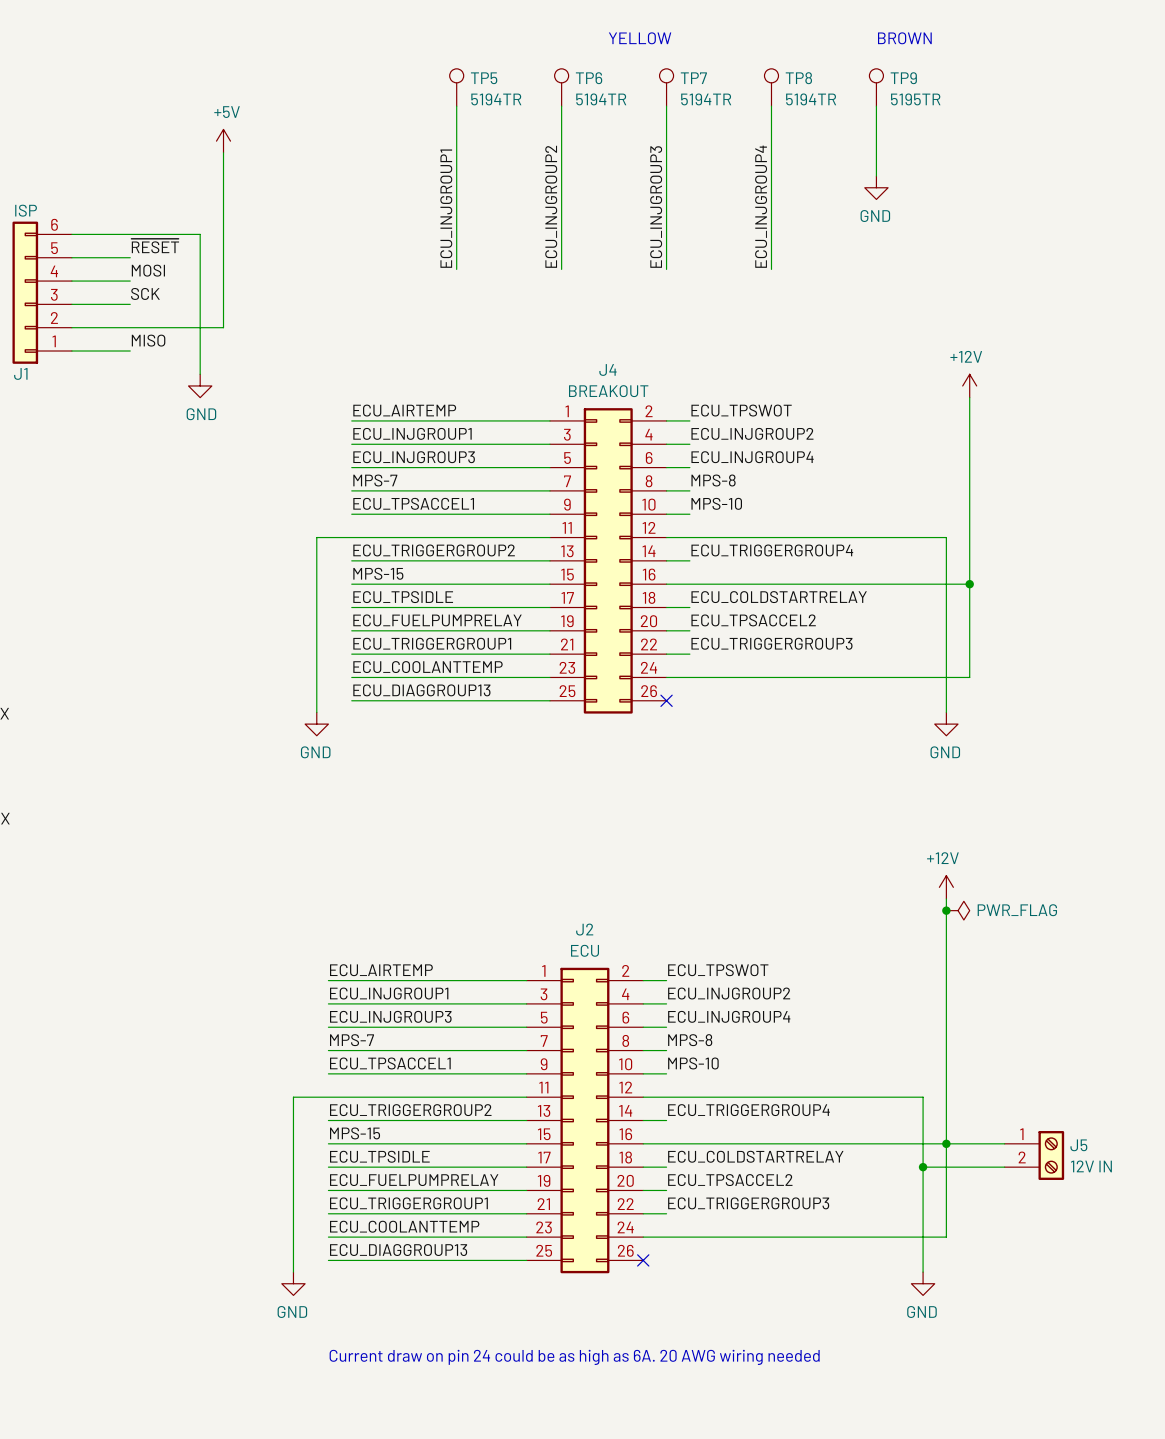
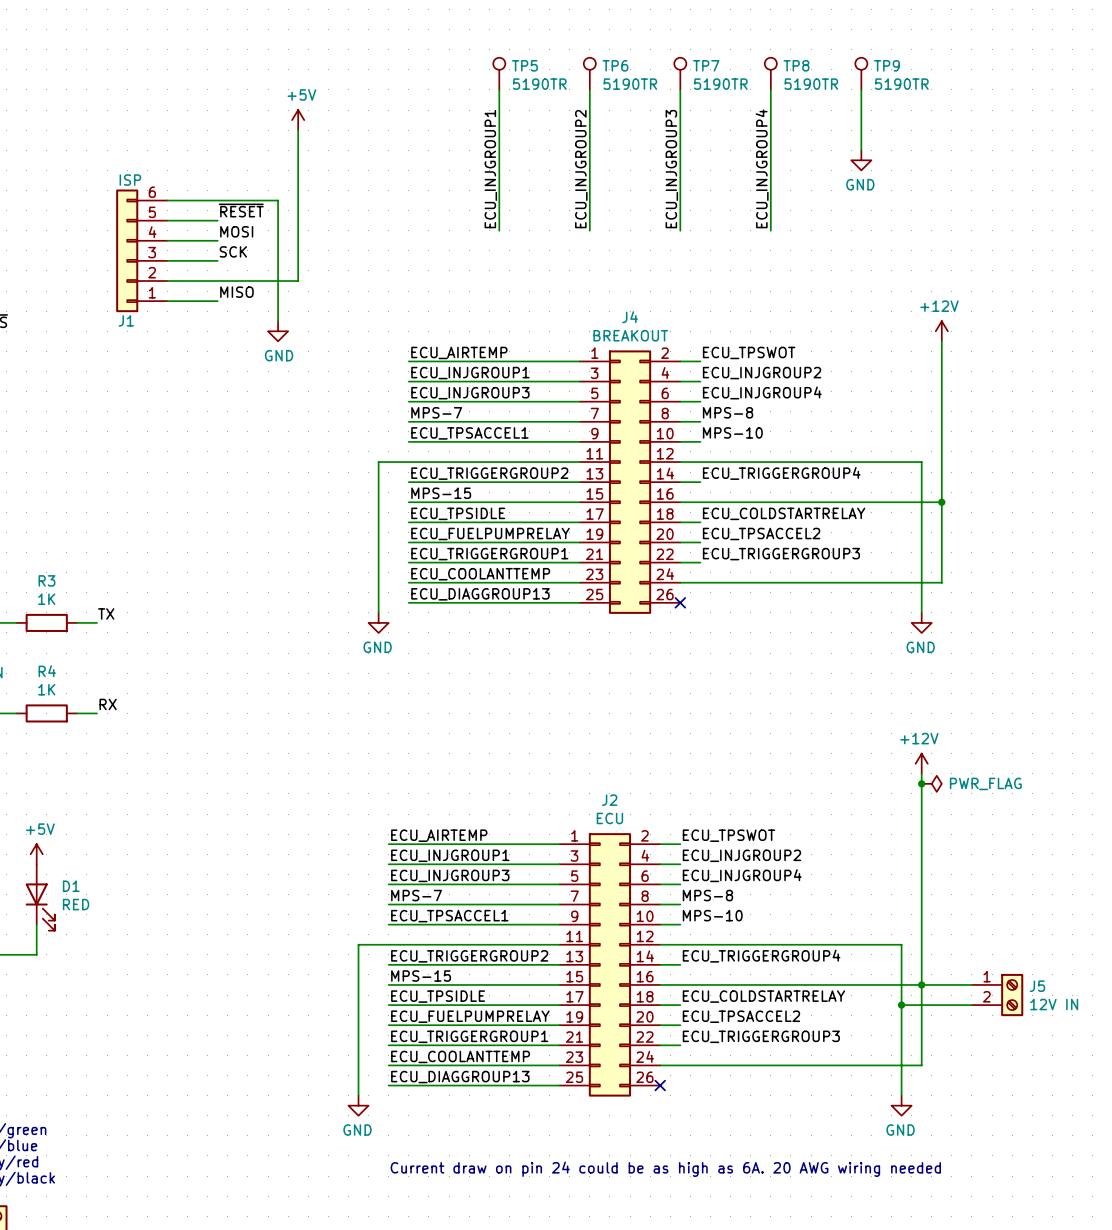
text: YELLOW (640, 38) -> none
text: BROWN (904, 38) -> none
TP5 value: 5194TR (496, 99) -> 5190TR (539, 84)
TP6 value: 5194TR (601, 99) -> 5190TR (630, 84)
TP7 value: 5194TR (706, 99) -> 5190TR (720, 84)
TP8 value: 5194TR (811, 99) -> 5190TR (811, 84)
TP9 value: 5195TR (915, 99) -> 5190TR (901, 84)

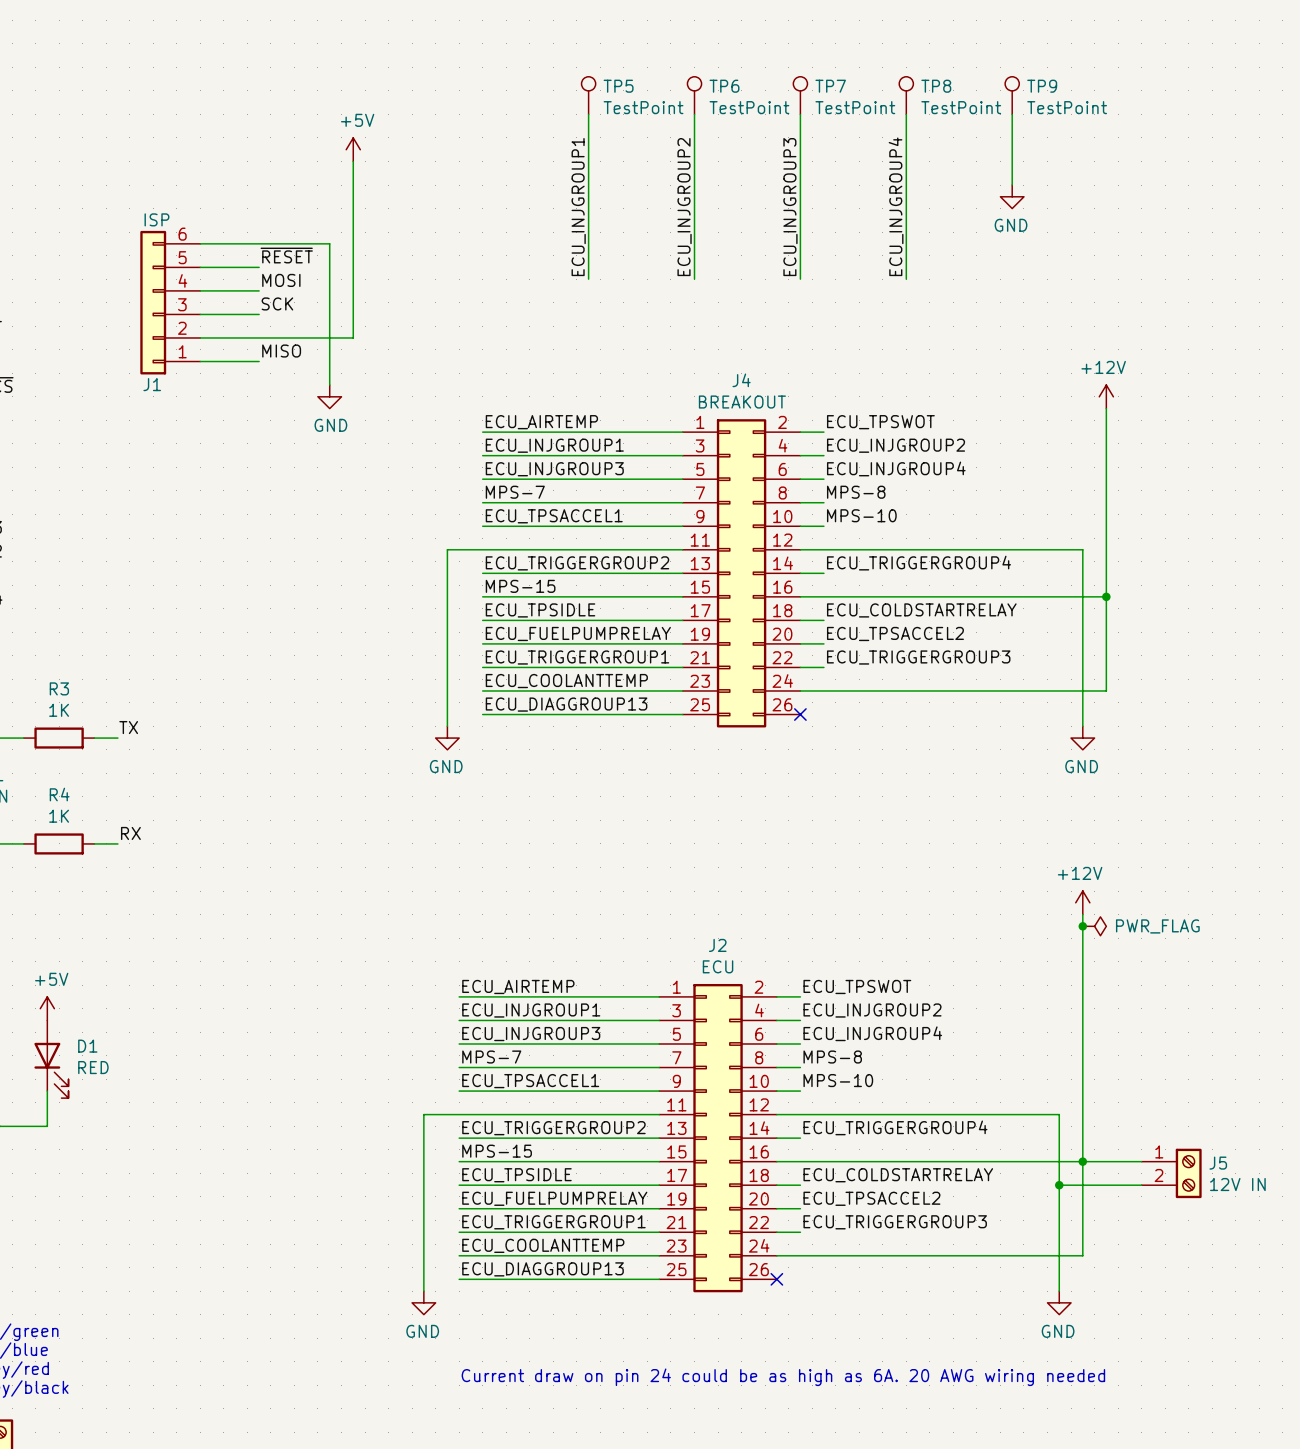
TP5 value: 5190TR (539, 84) -> TestPoint (643, 107)
TP6 value: 5190TR (630, 84) -> TestPoint (749, 107)
TP7 value: 5190TR (720, 84) -> TestPoint (855, 107)
TP8 value: 5190TR (811, 84) -> TestPoint (961, 107)
TP9 value: 5190TR (901, 84) -> TestPoint (1067, 107)

